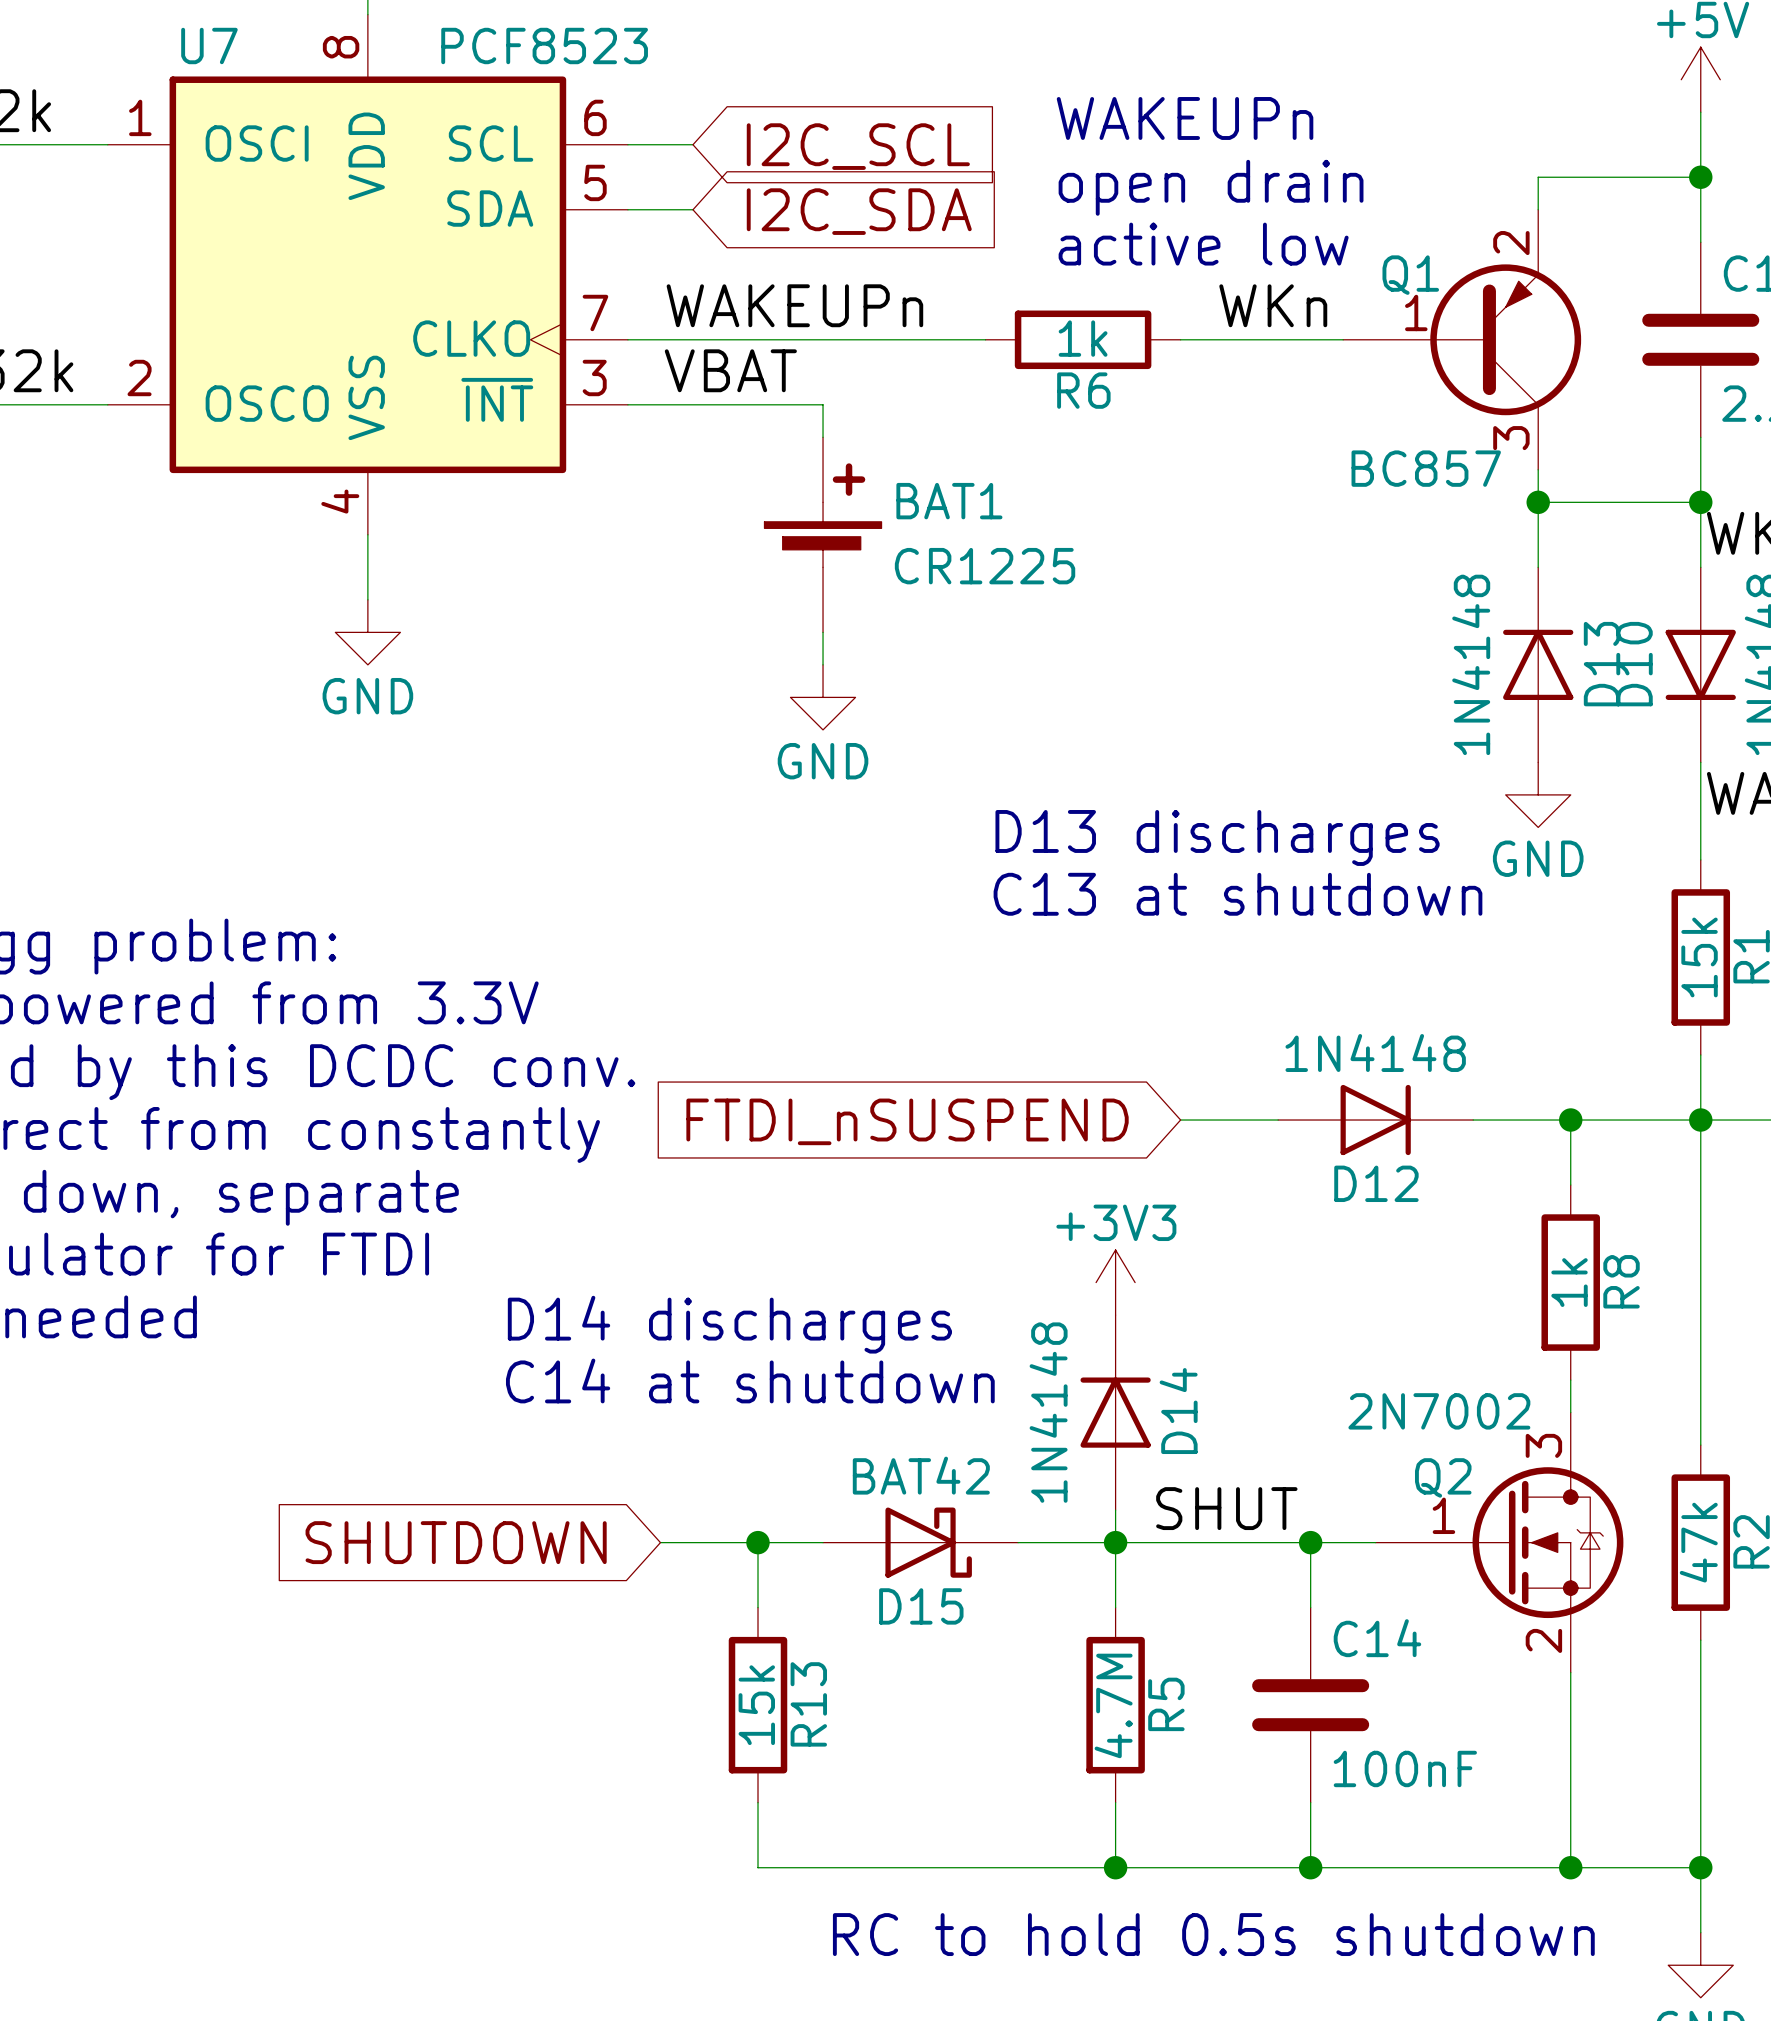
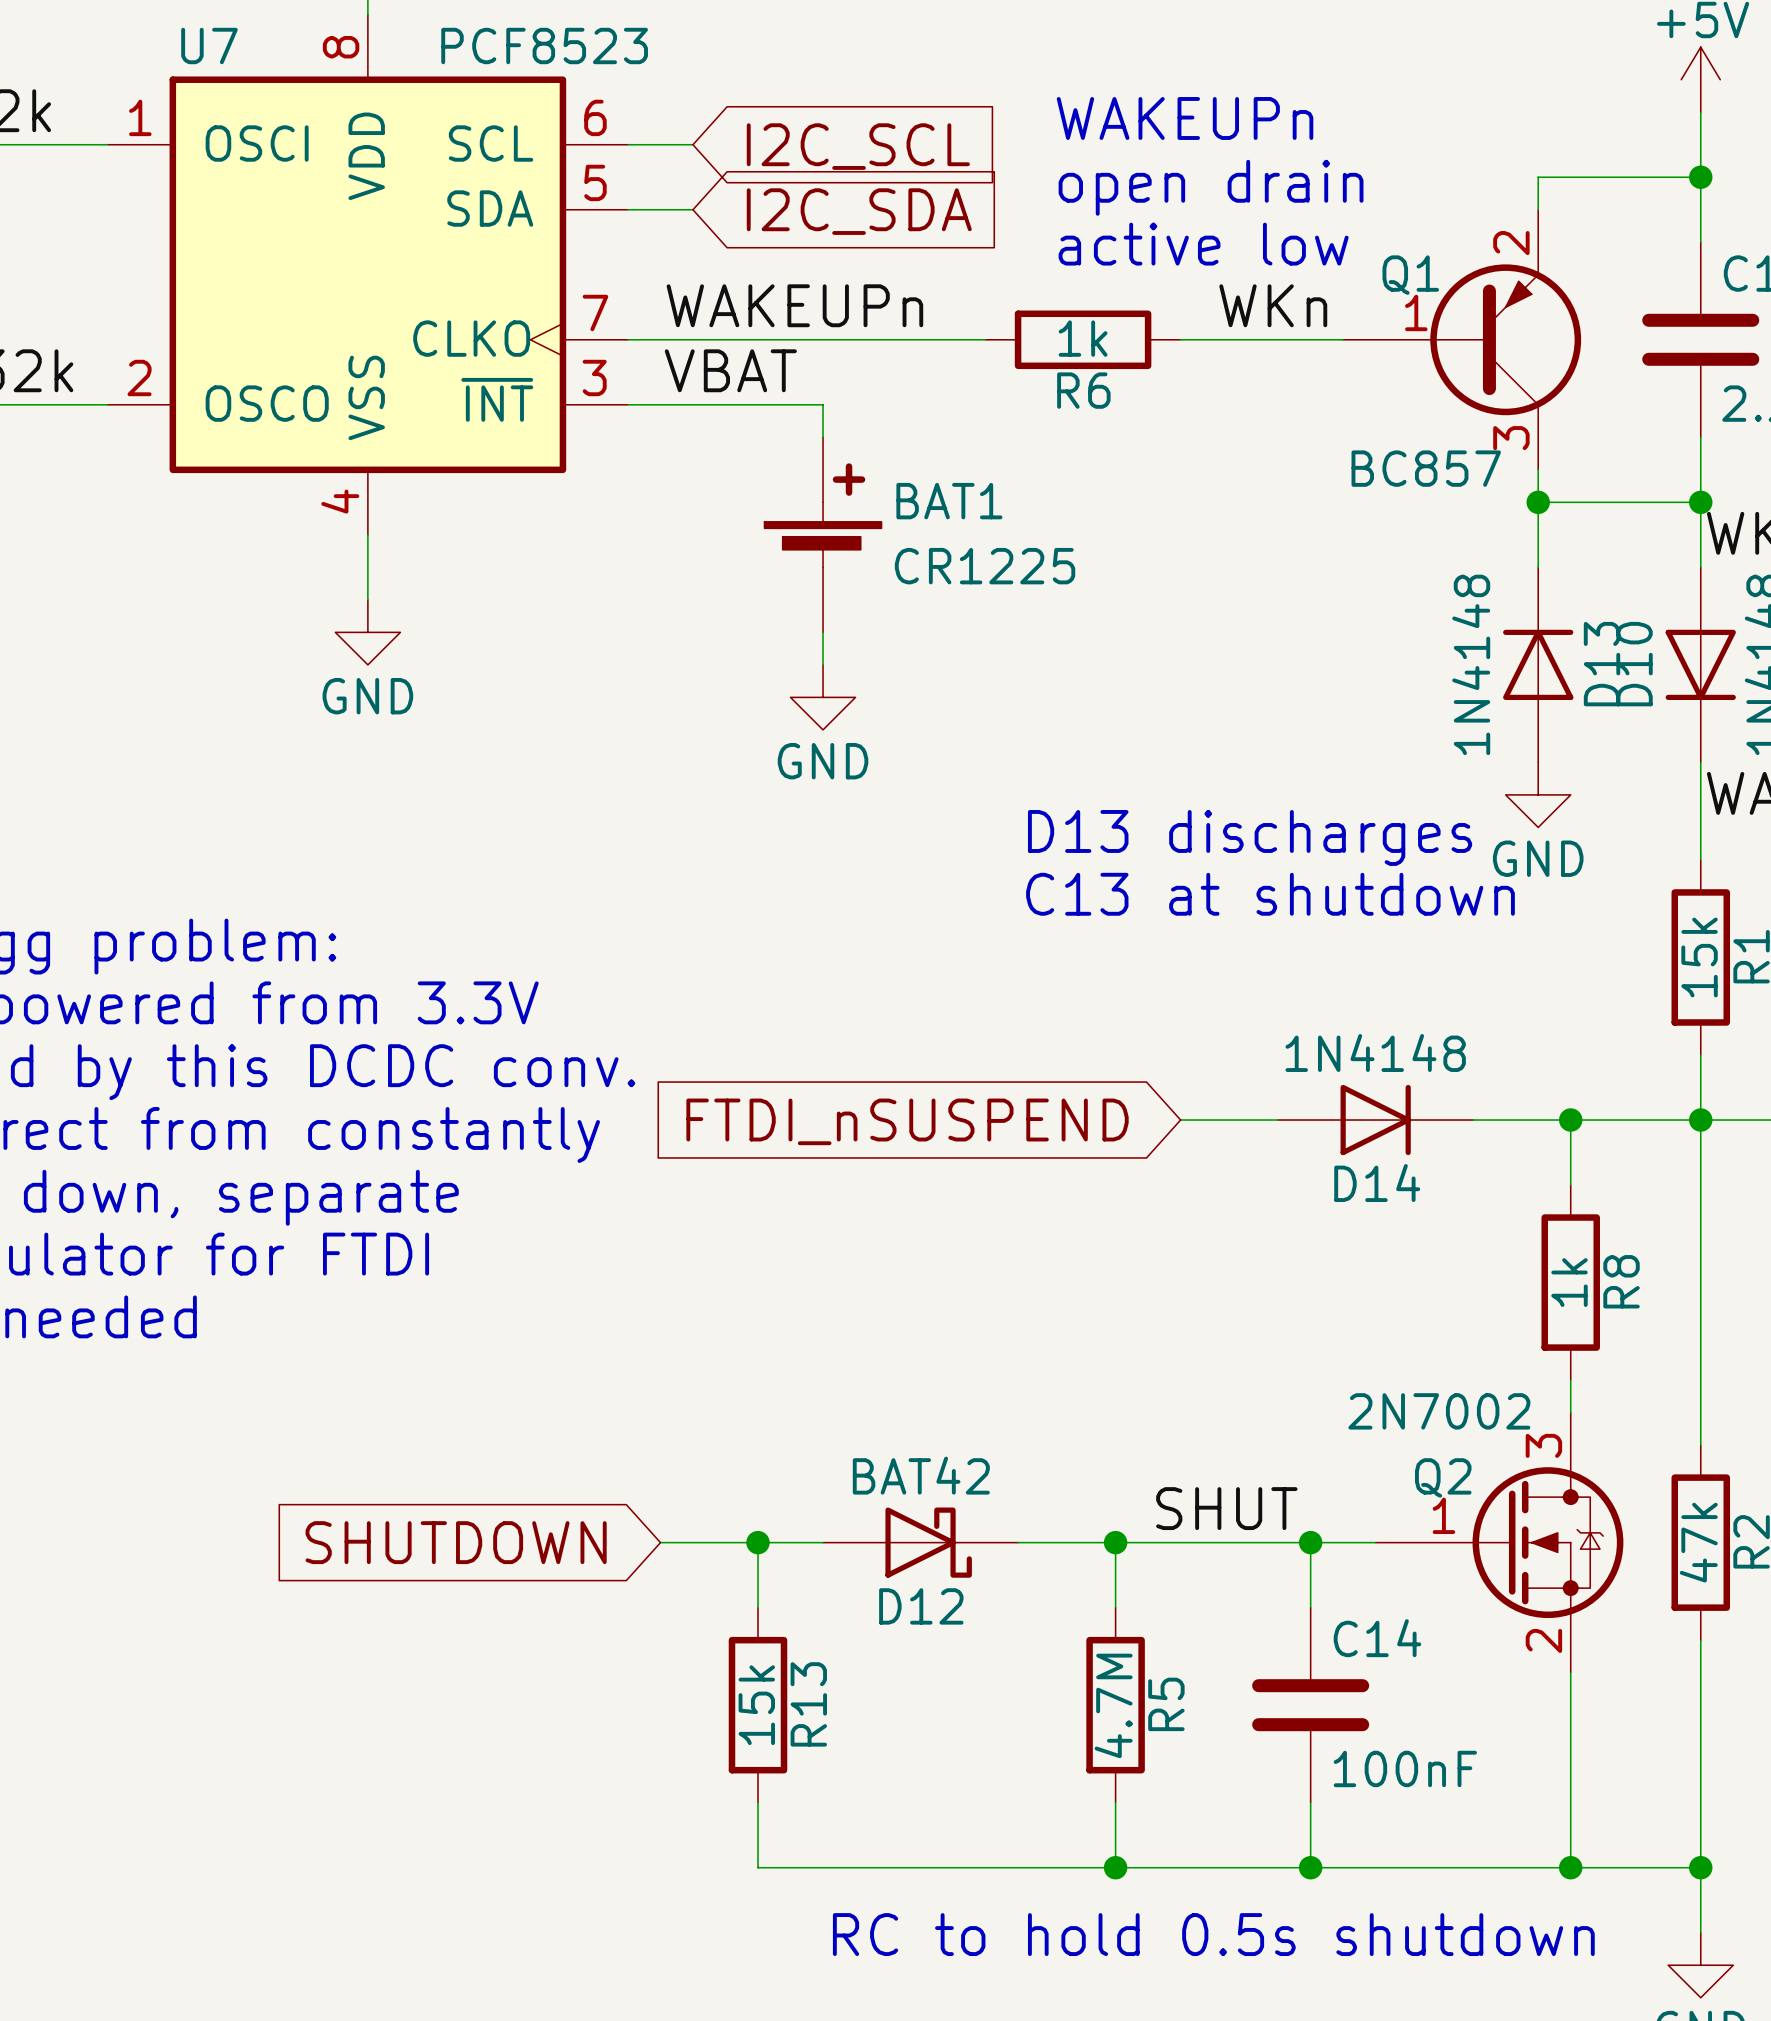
text position: D13 discharges (1217, 837) -> D13 discharges (1250, 837)
text position: C13 at shutdown (1237, 894) -> C13 at shutdown (1270, 894)
D12 name: D12 (1376, 1183) -> D14 (1377, 1183)
power symbol: +3V3 (1115, 1282) -> none
text: D14 discharges (729, 1324) -> none
text: C14 at shutdown (750, 1380) -> none
D14: 1N4148 (1115, 1412) -> none
wire: (1115, 1510) (1115, 1542) -> none
D15 name: D15 (921, 1606) -> D12 (921, 1606)

